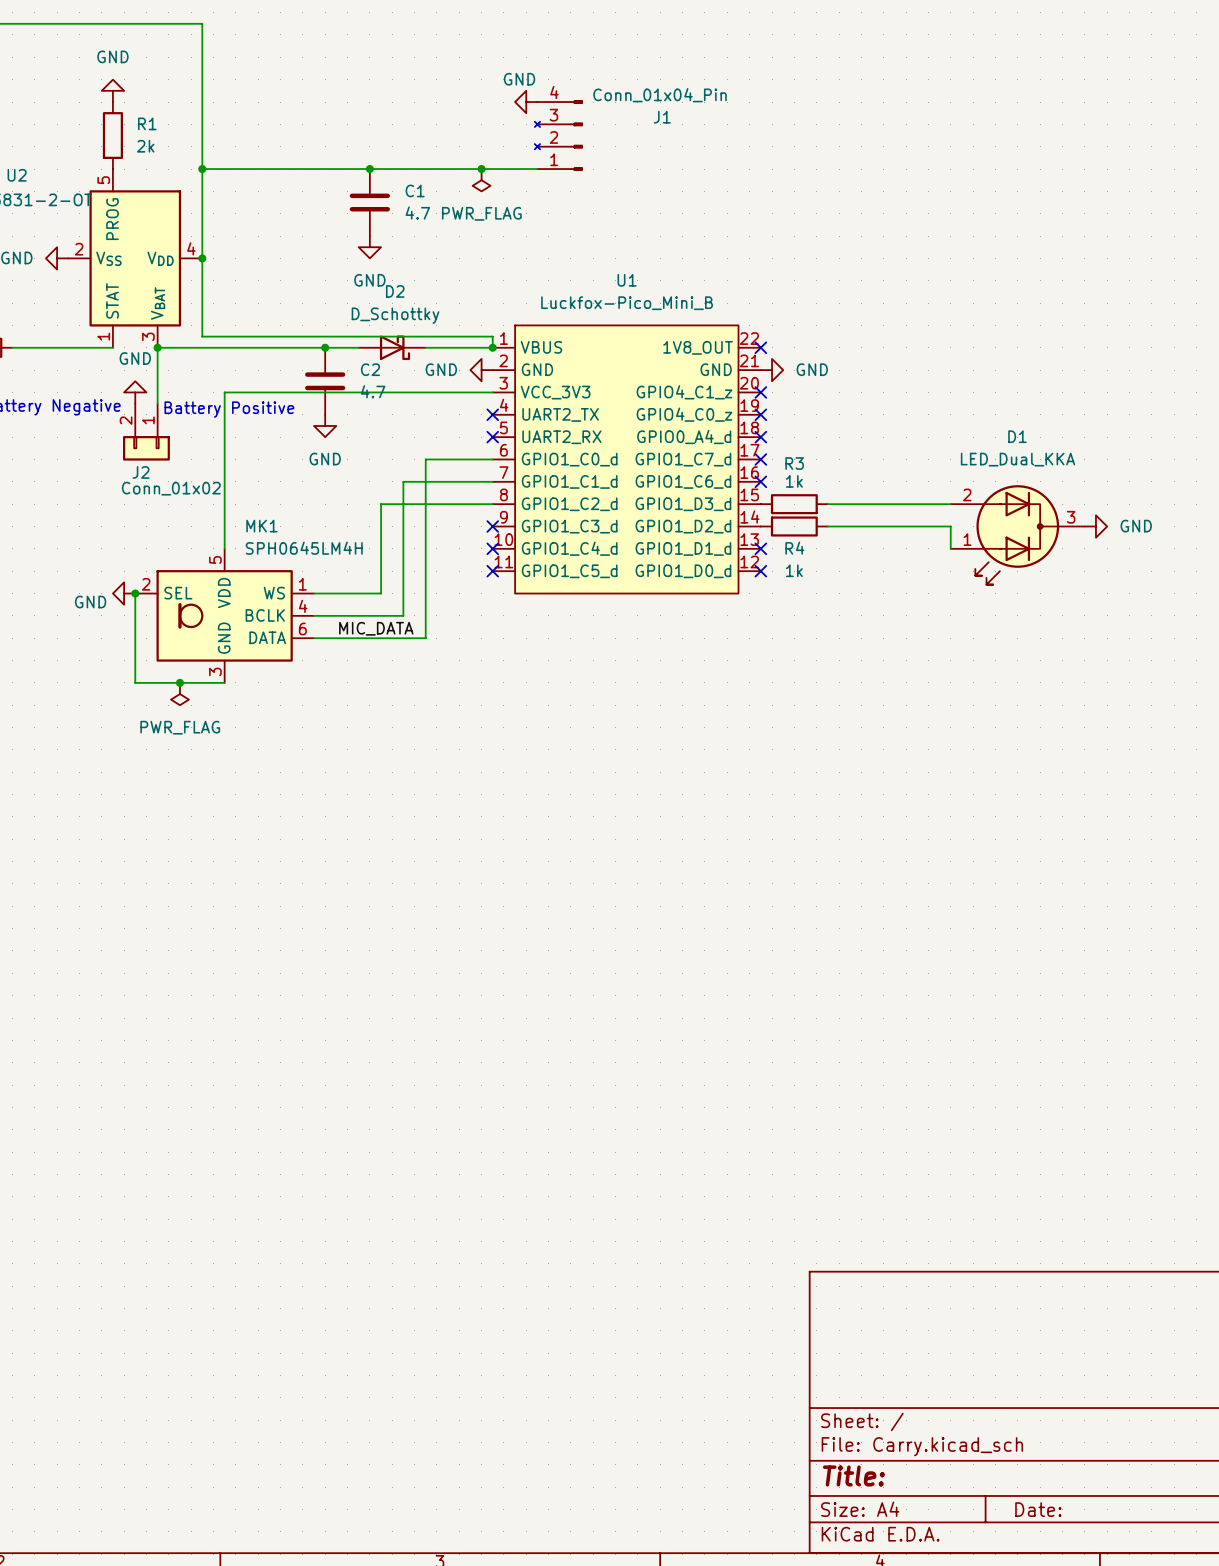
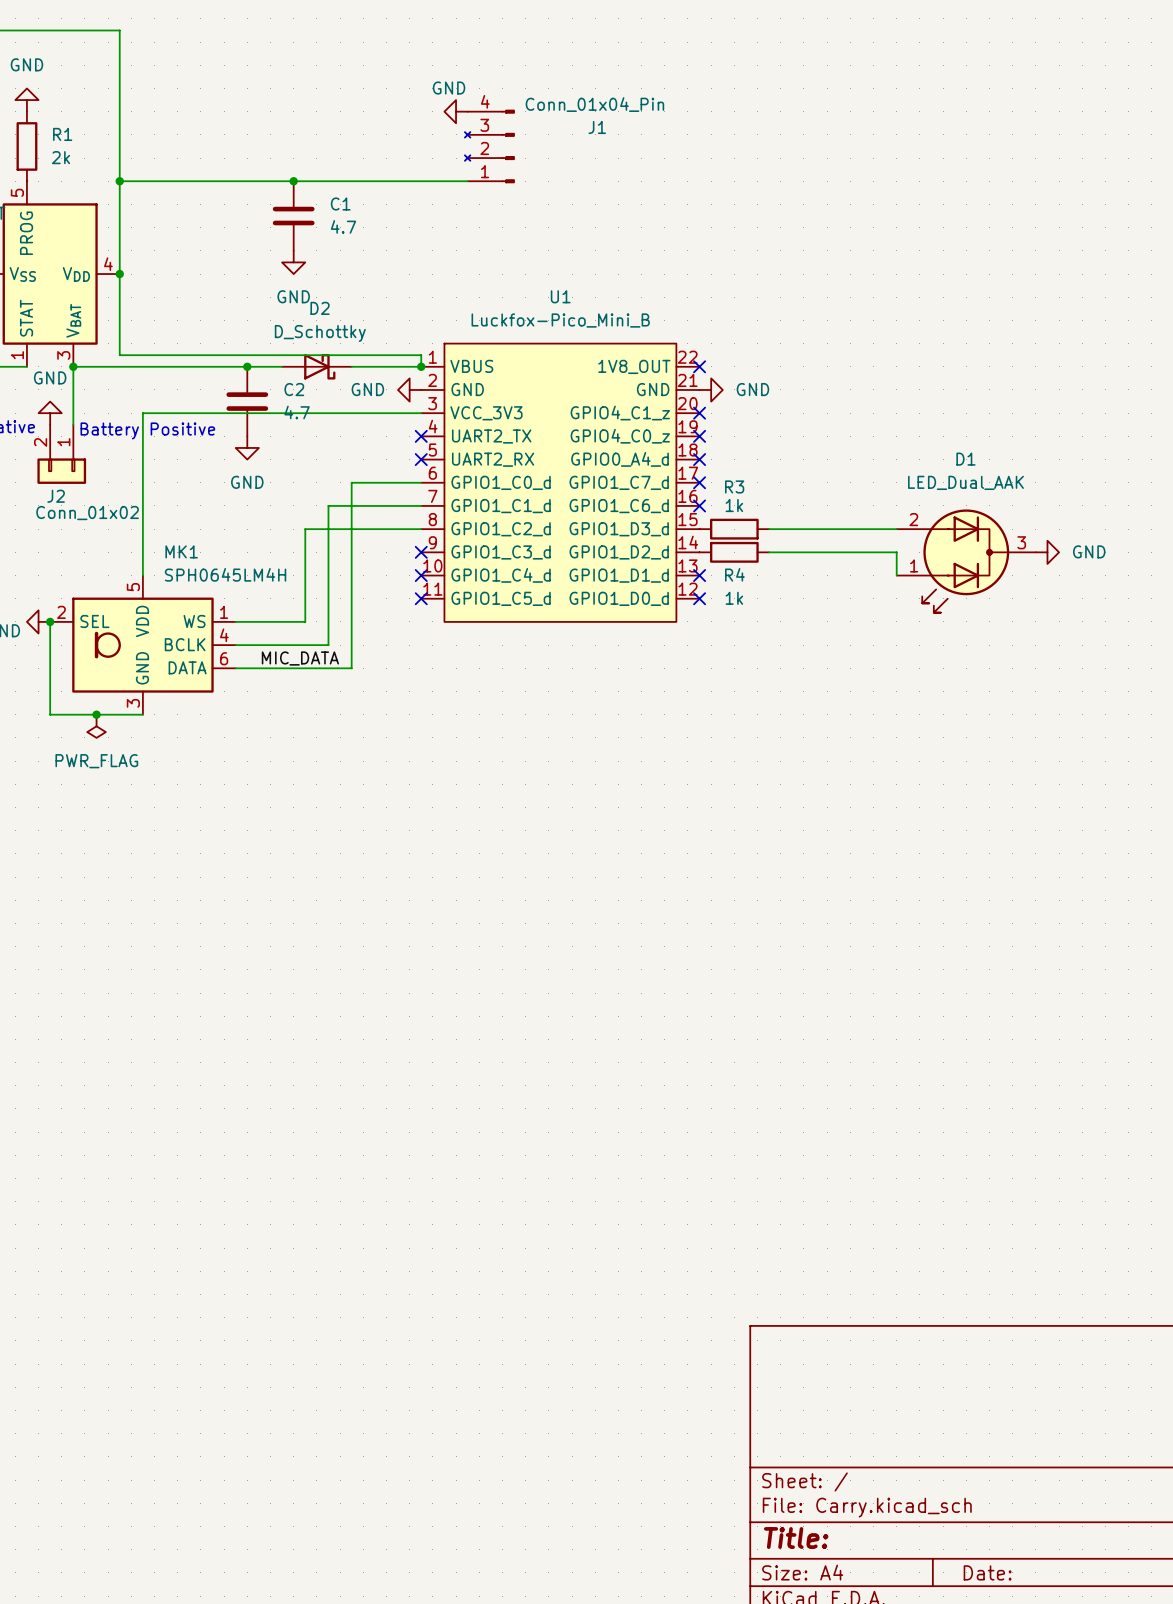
junction: (481, 169) -> none
power symbol: PWR_FLAG (481, 180) -> none
D1 value: LED_Dual_KKA (1018, 459) -> LED_Dual_AAK (965, 482)

